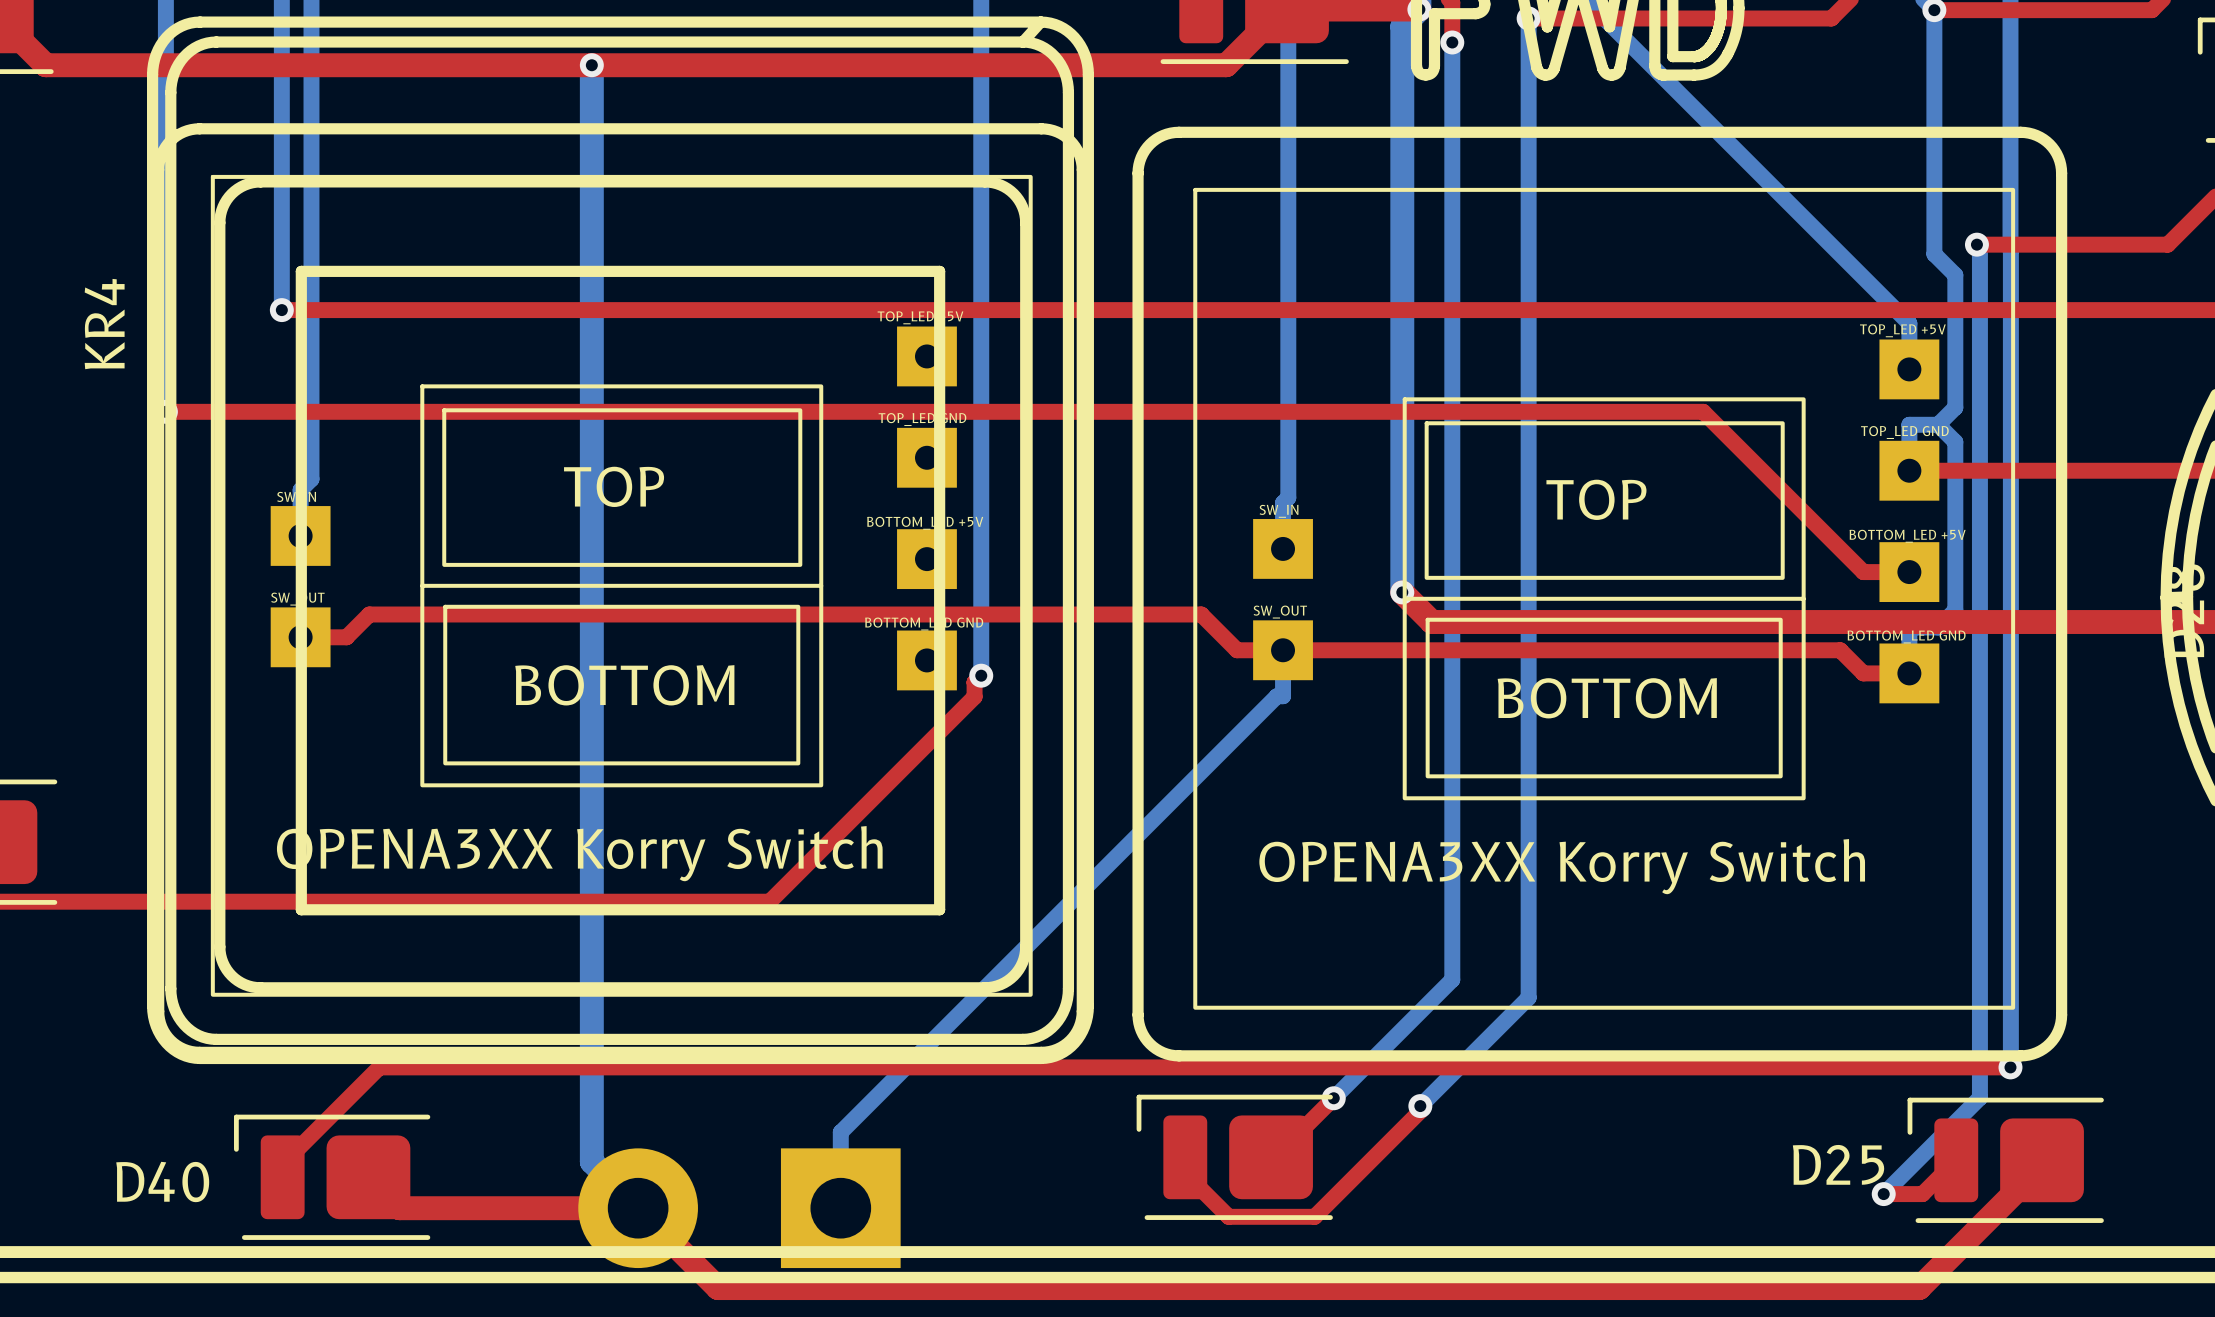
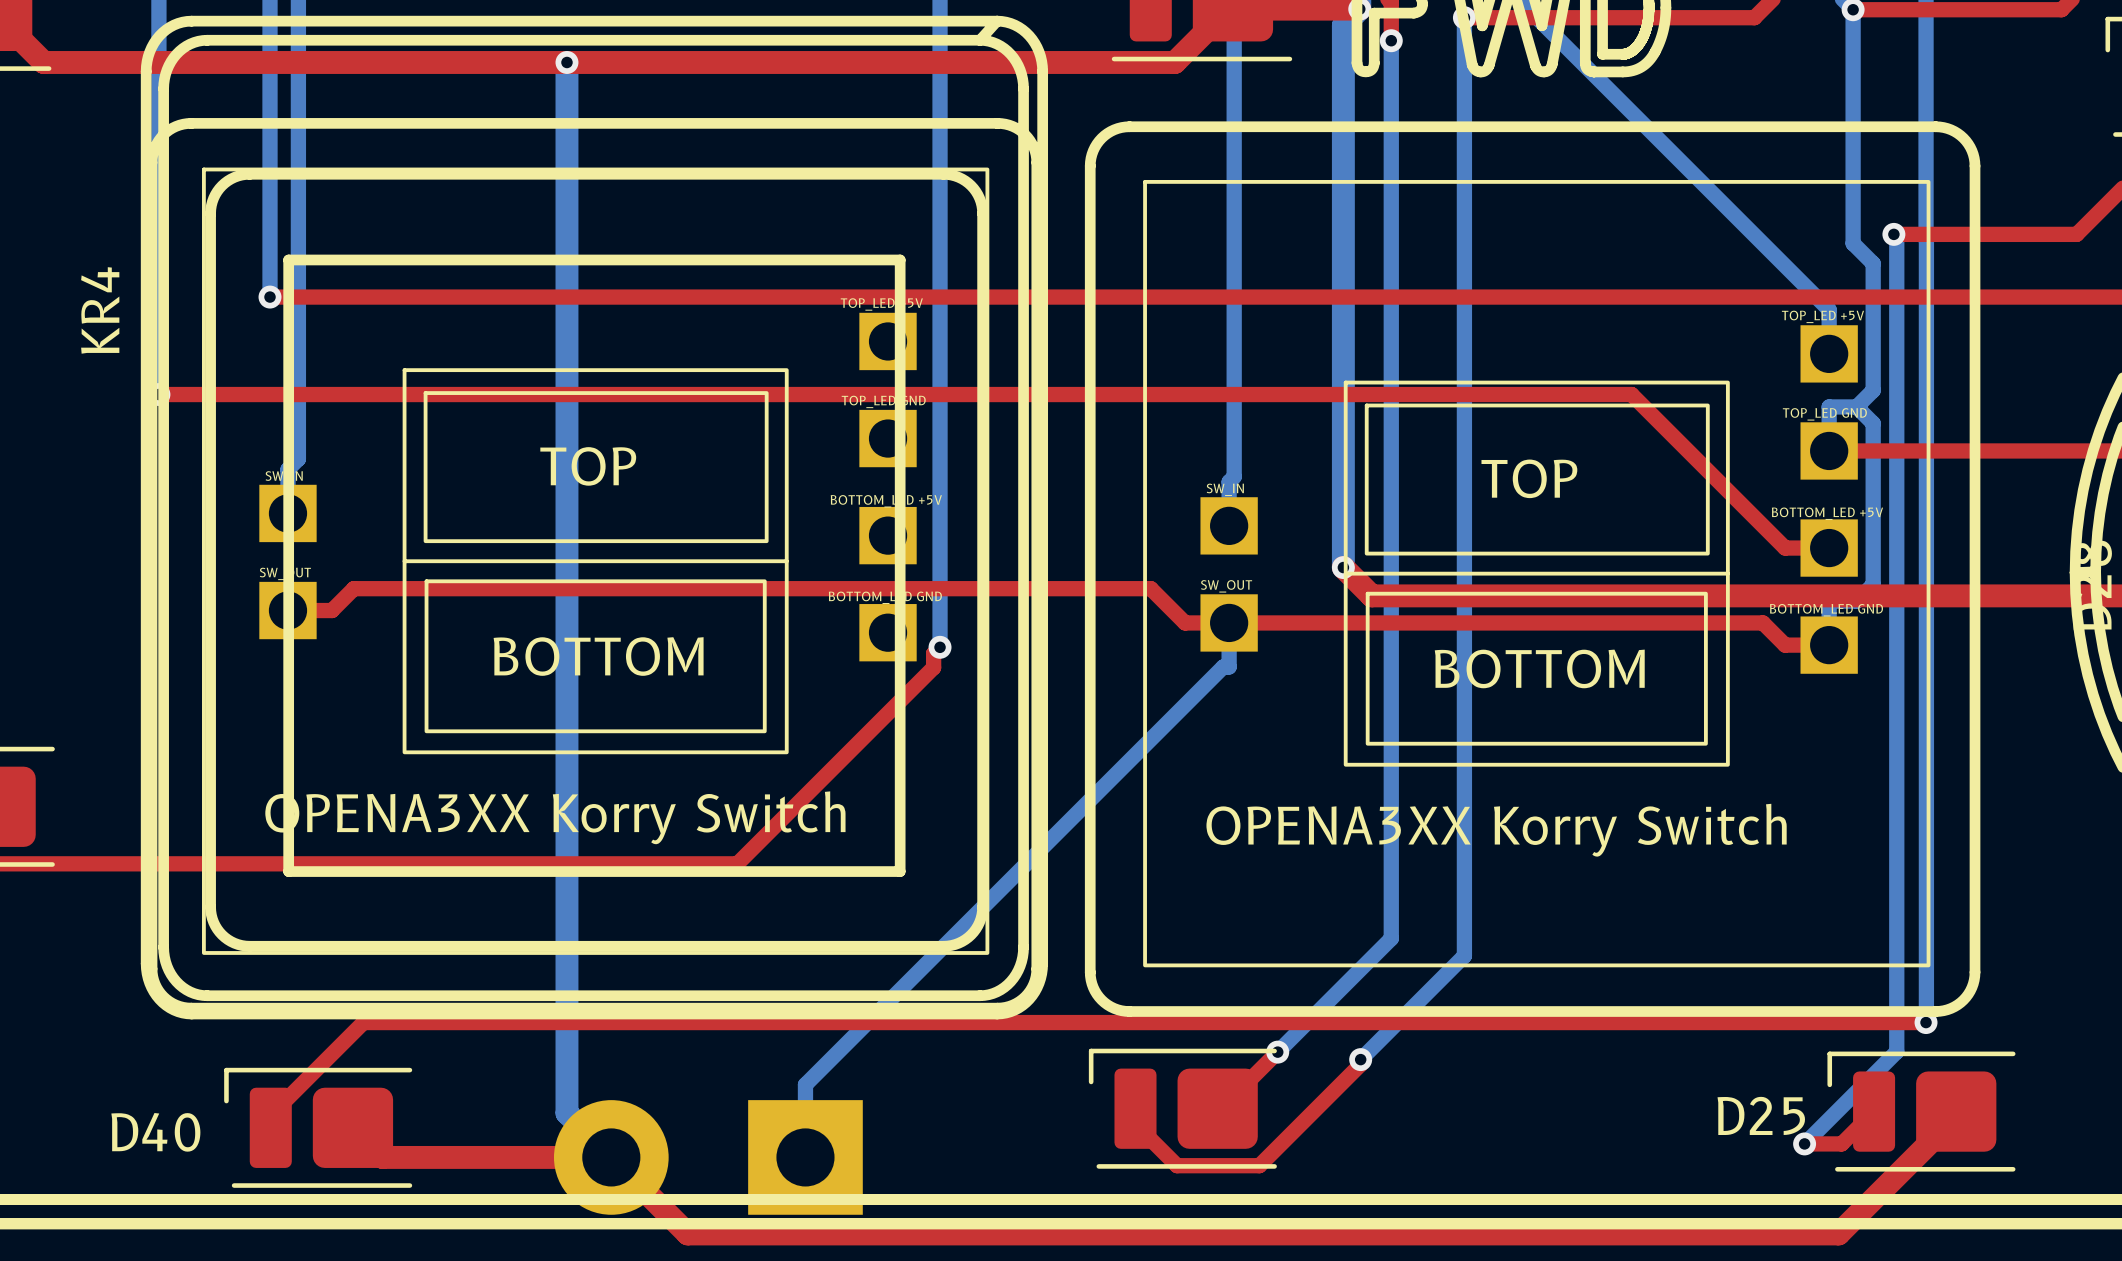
KR4 footprint: [210, 174, 1033, 997] -> [201, 167, 990, 955]
part footprint: [1193, 187, 2016, 1010] -> [1143, 179, 1931, 968]

